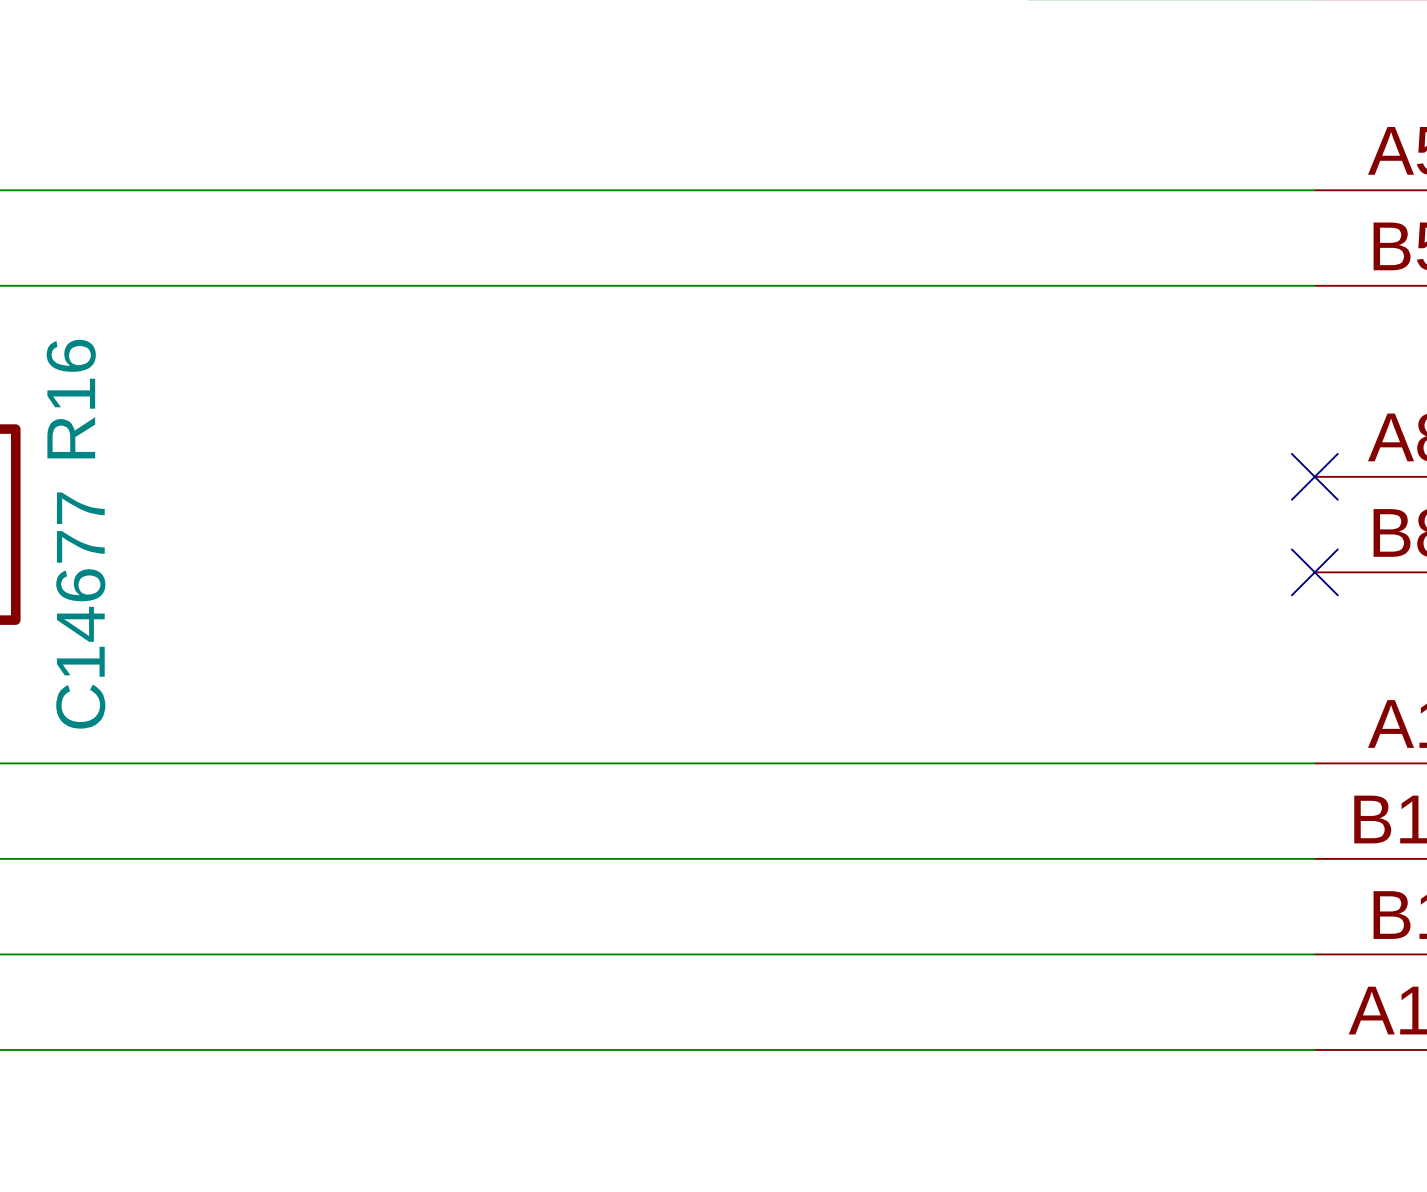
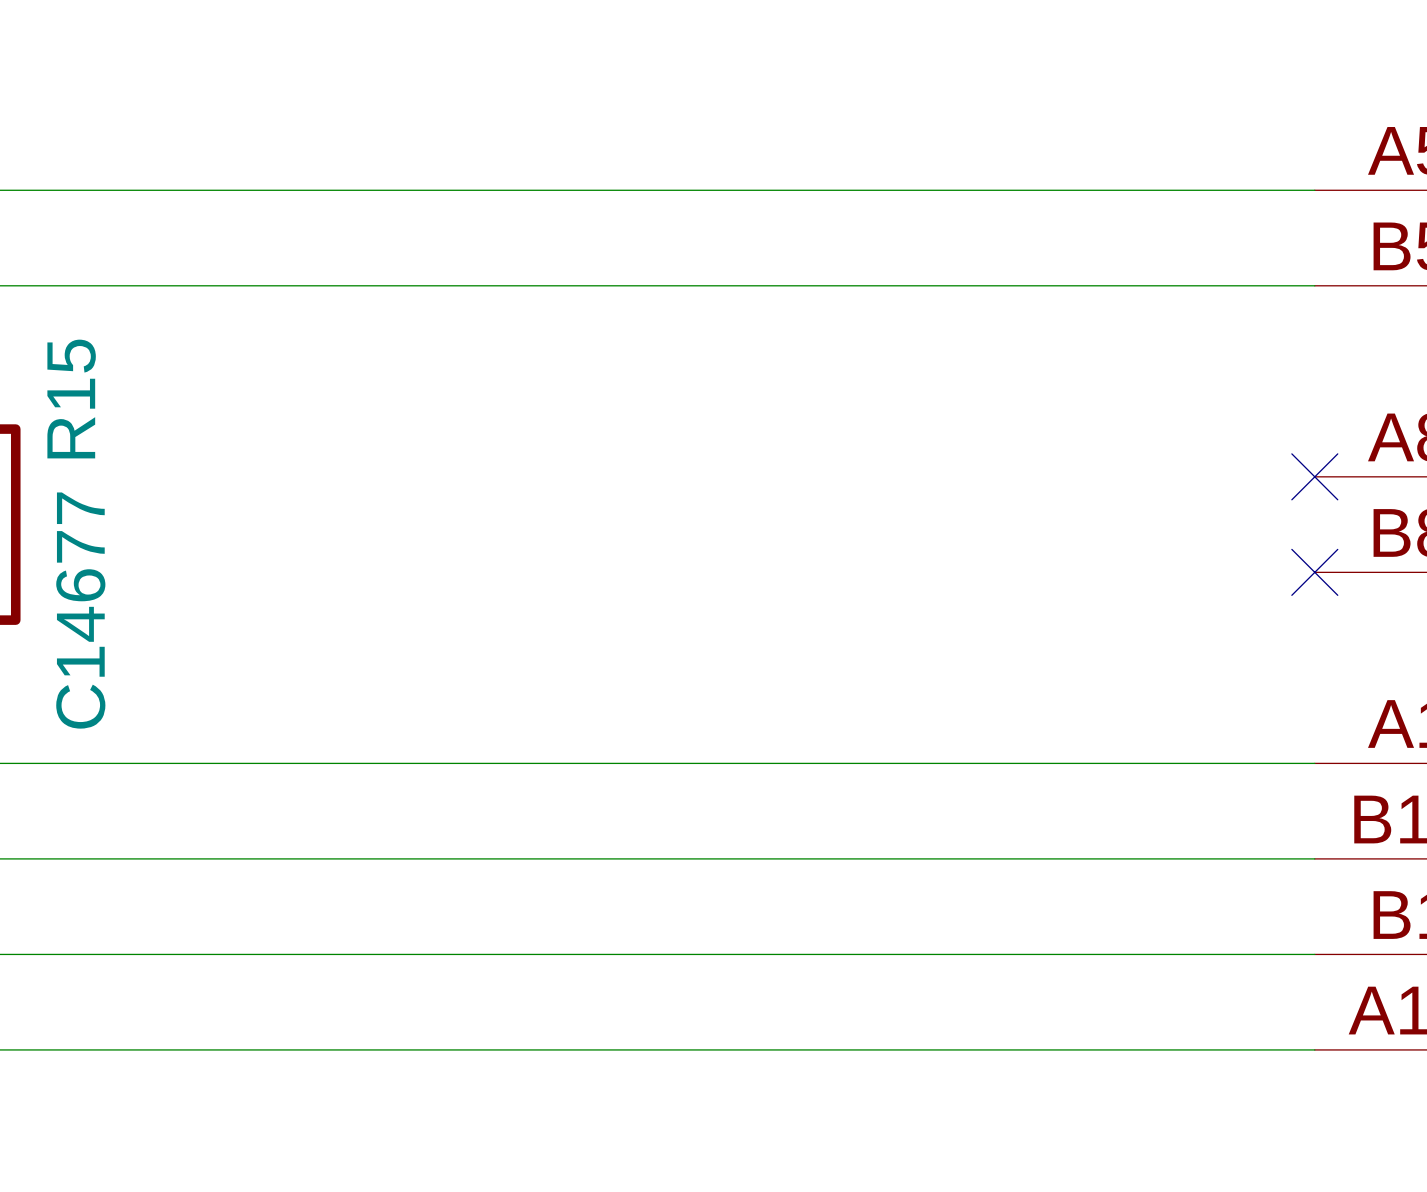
R16 name: R16 (71, 399) -> R15 (71, 399)

